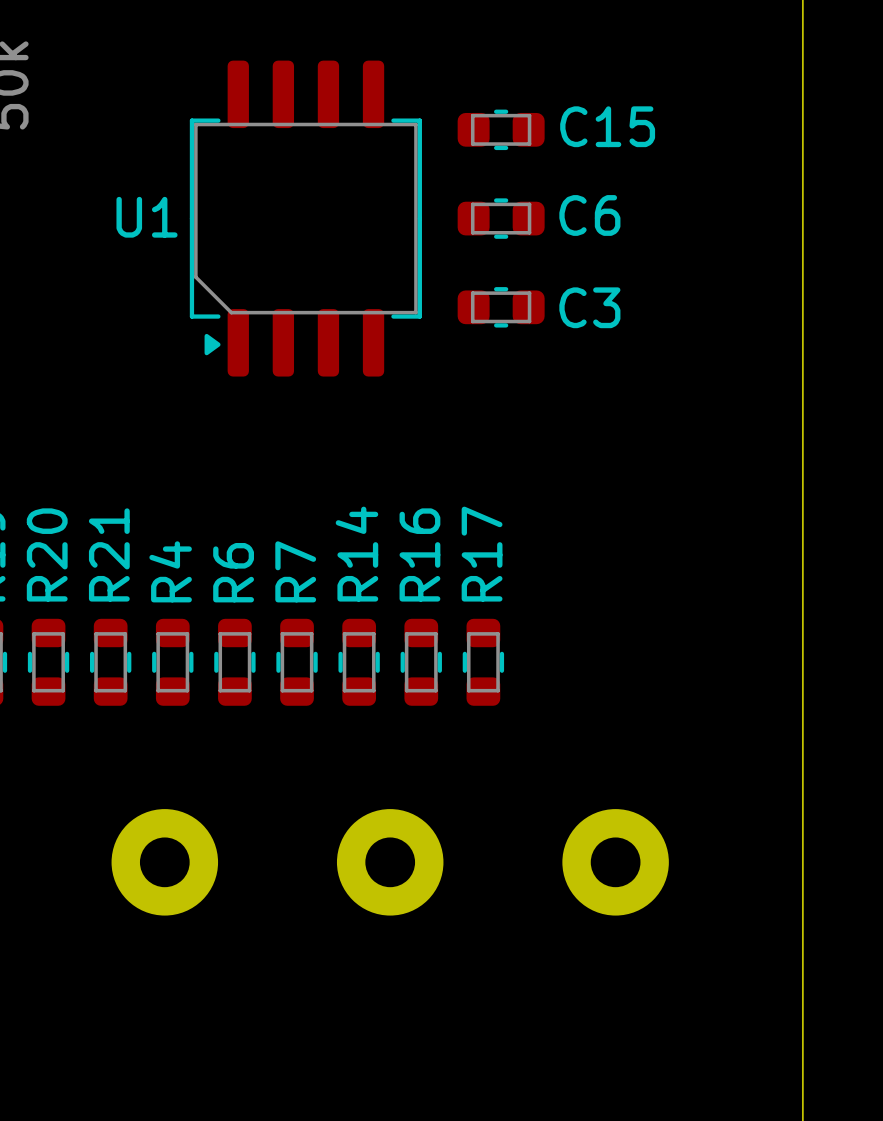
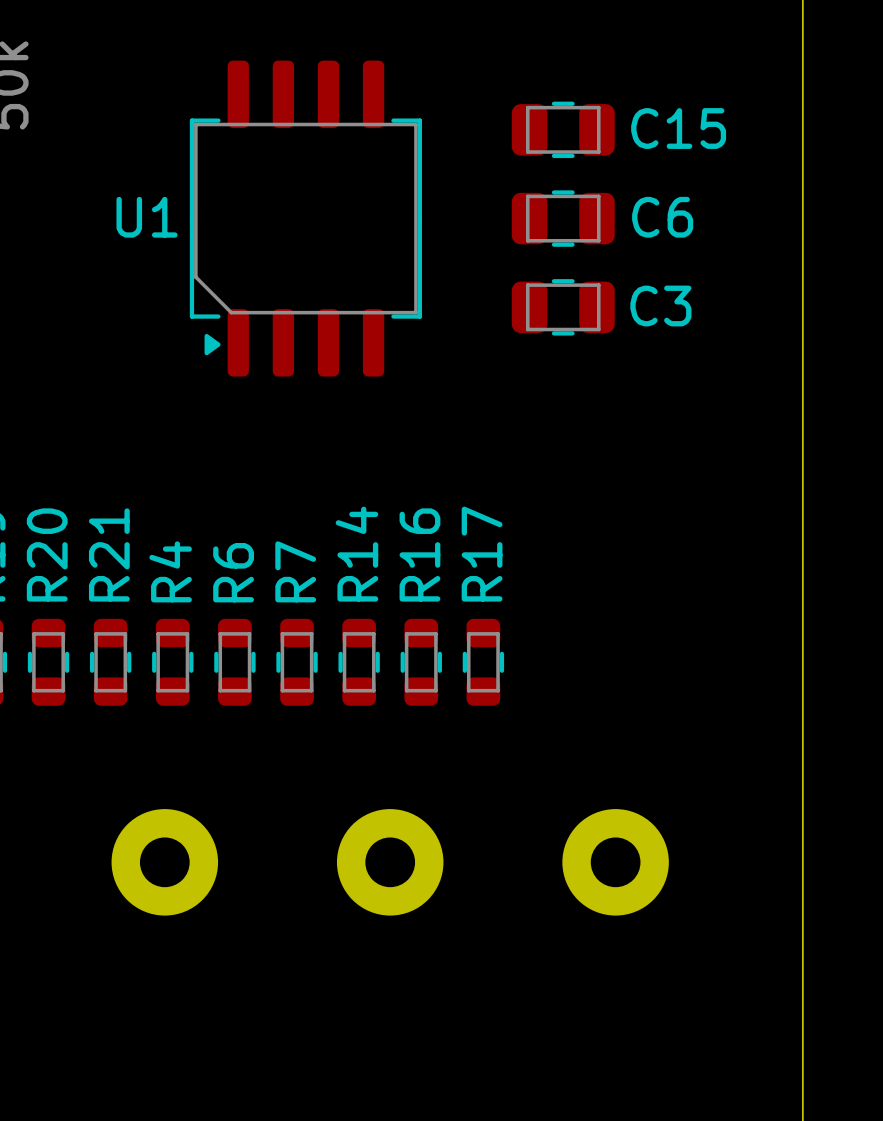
C15 footprint: [457, 109, 545, 151] -> [511, 101, 615, 159]
C6 footprint: [457, 198, 545, 239] -> [511, 190, 615, 247]
C3 footprint: [457, 287, 545, 328] -> [511, 279, 615, 336]

